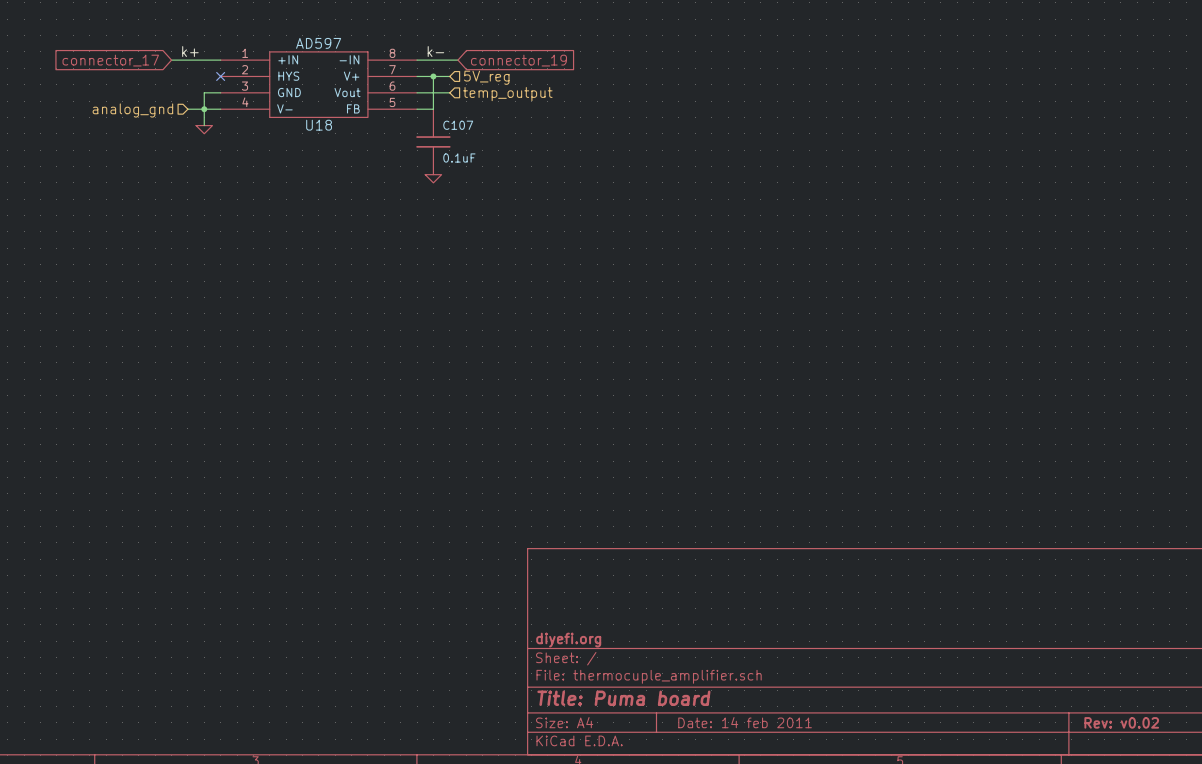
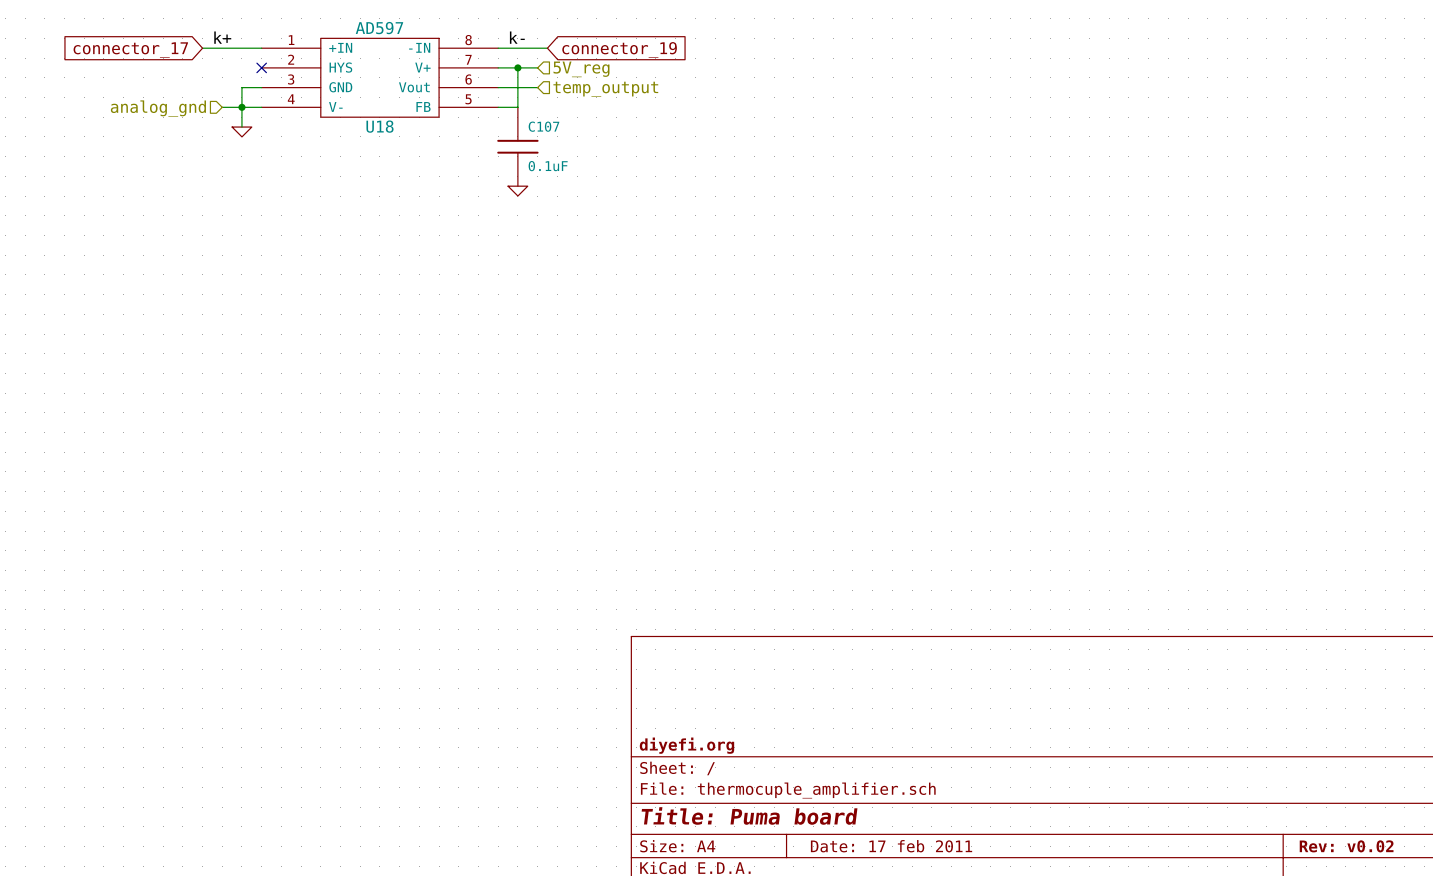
title block: Date: 14 feb 2011 (745, 722) -> Date: 17 feb 2011 (891, 846)

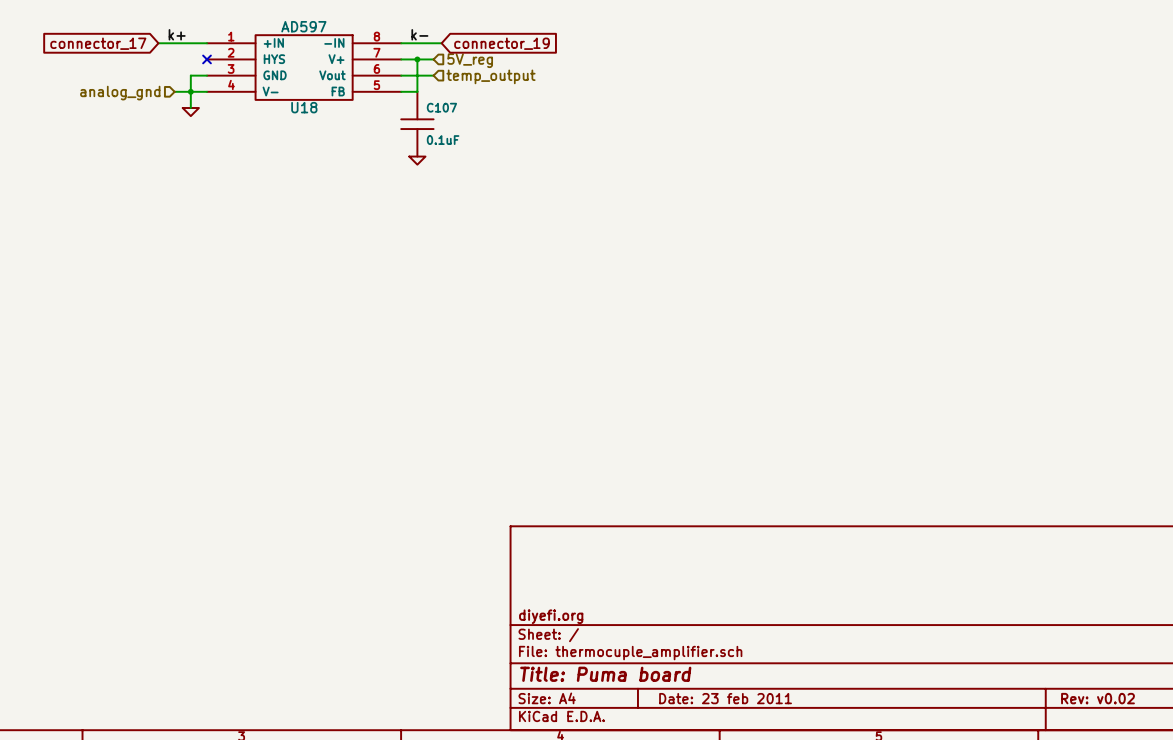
title block: Date: 17 feb 2011 (891, 846) -> Date: 23 feb 2011 (725, 698)

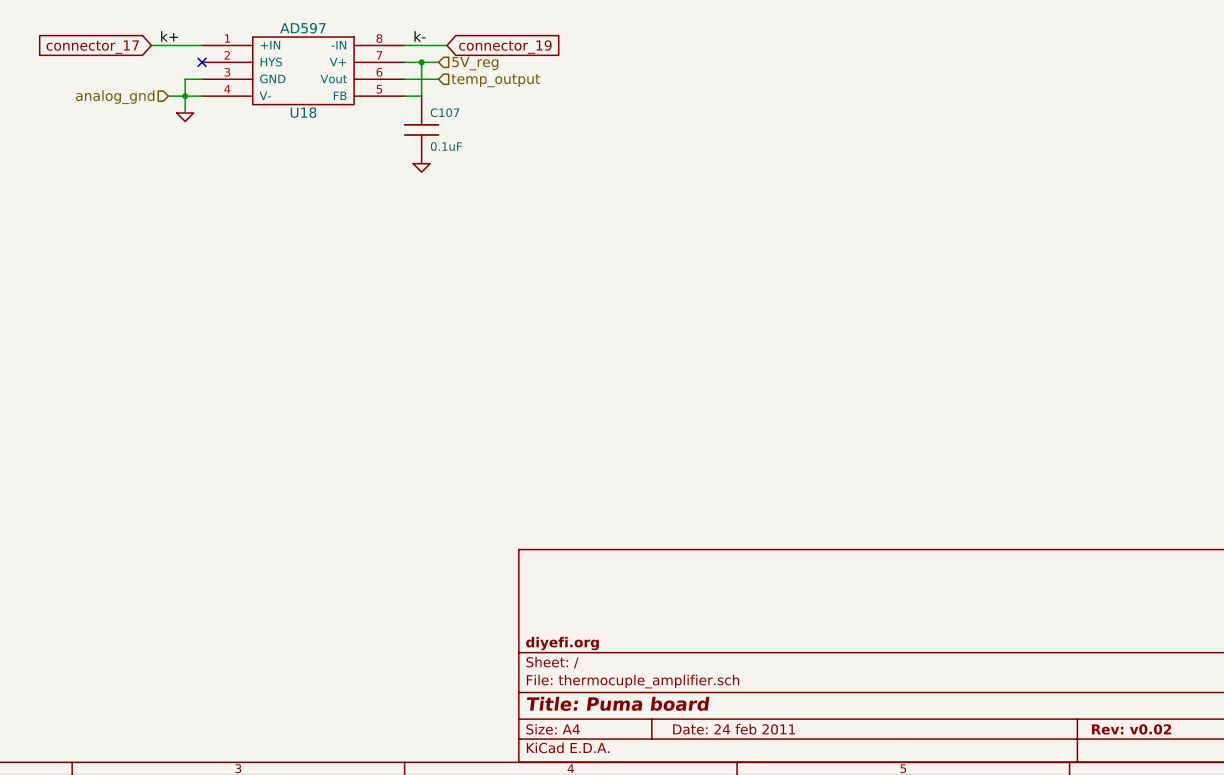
title block: Date: 23 feb 2011 (725, 698) -> Date: 24 feb 2011 (734, 729)

